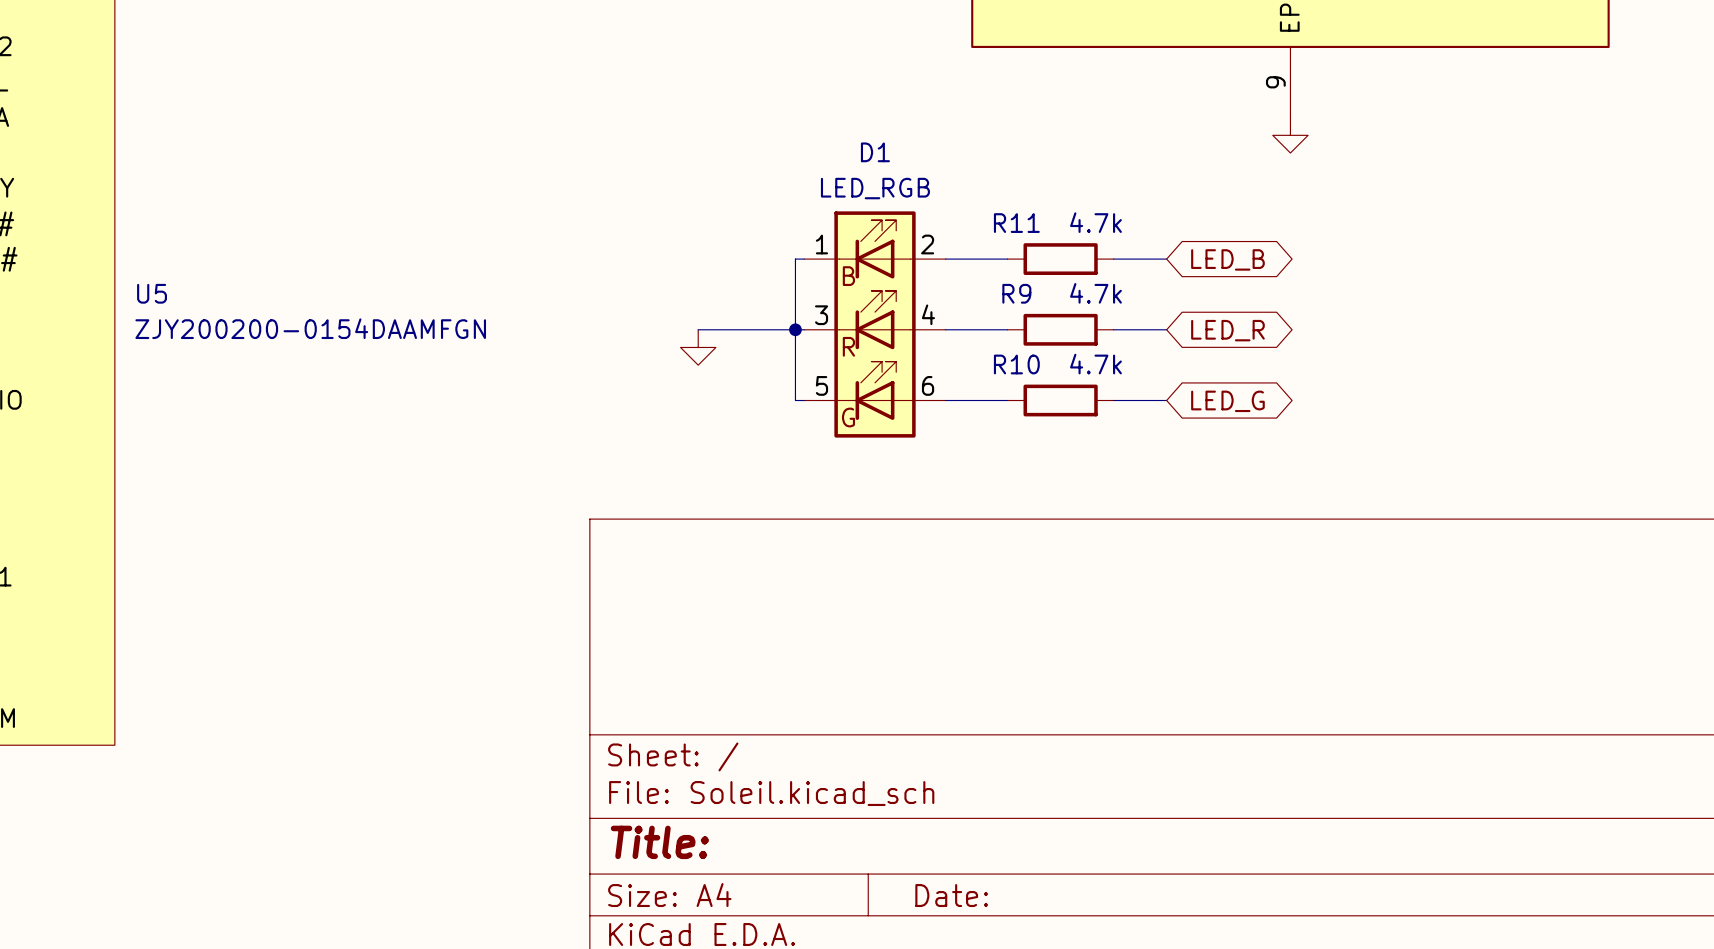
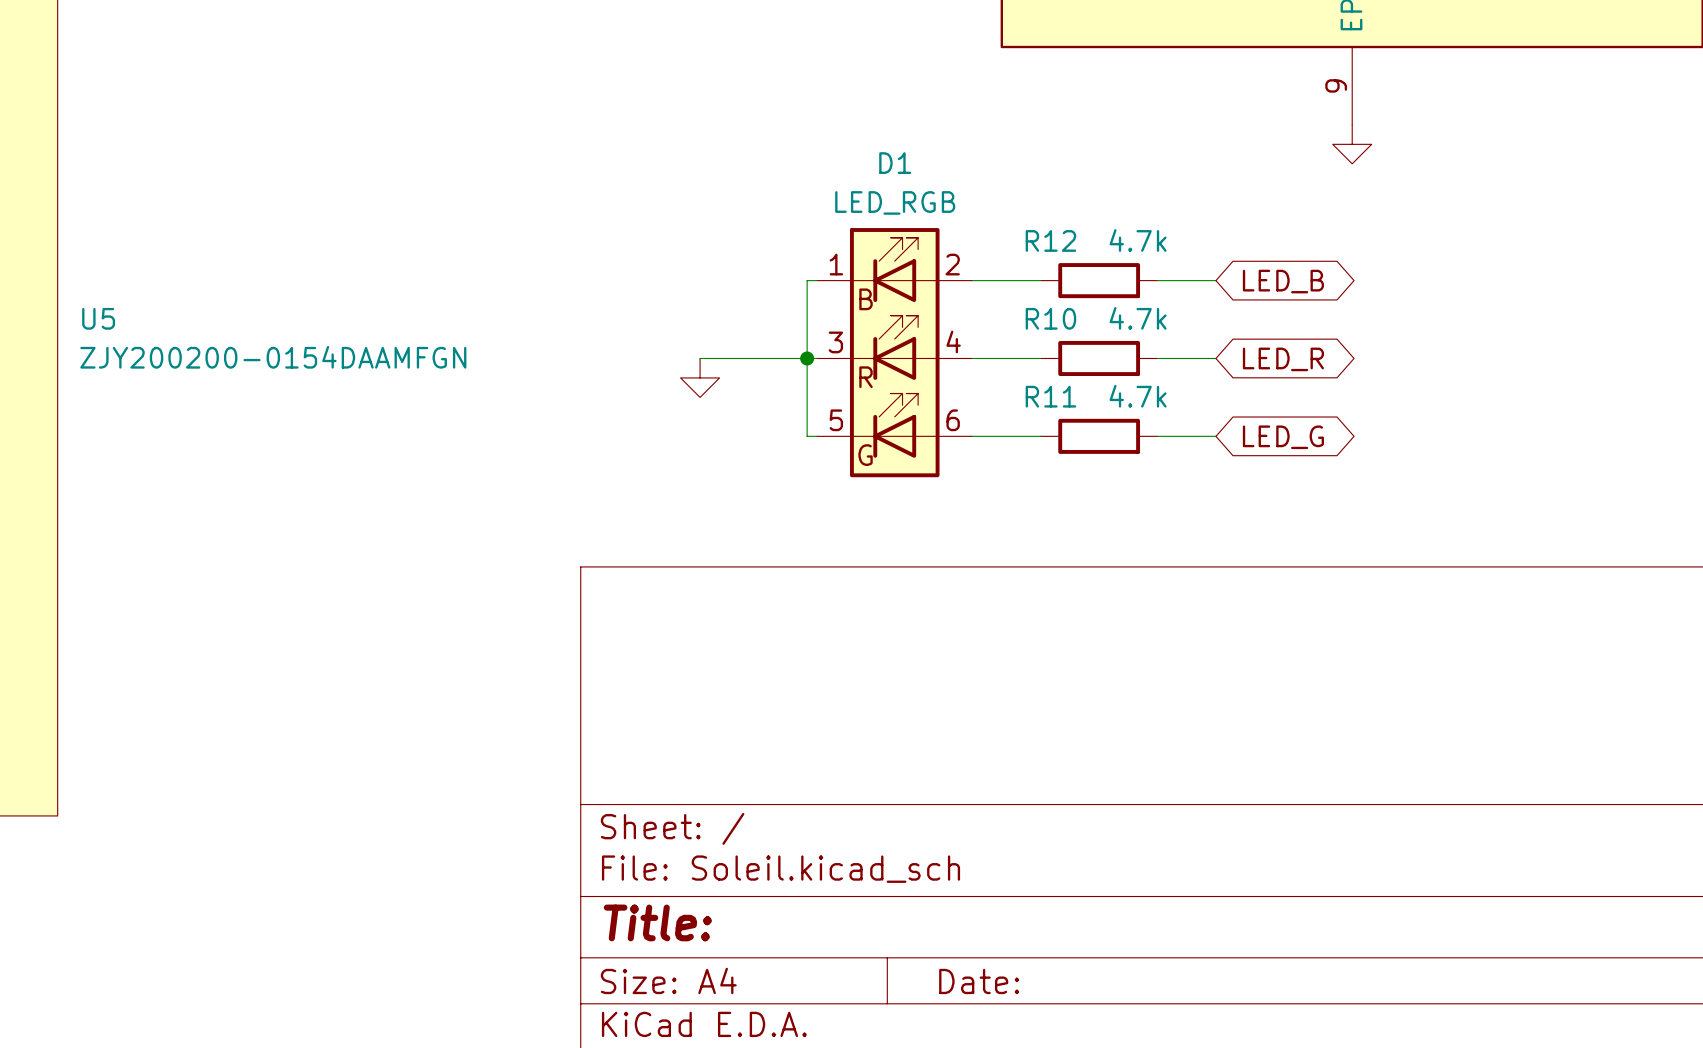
R11 name: R11 (1016, 223) -> R12 (1050, 240)
R9 name: R9 (1016, 293) -> R10 (1050, 318)
R10 name: R10 (1016, 364) -> R11 (1050, 396)

